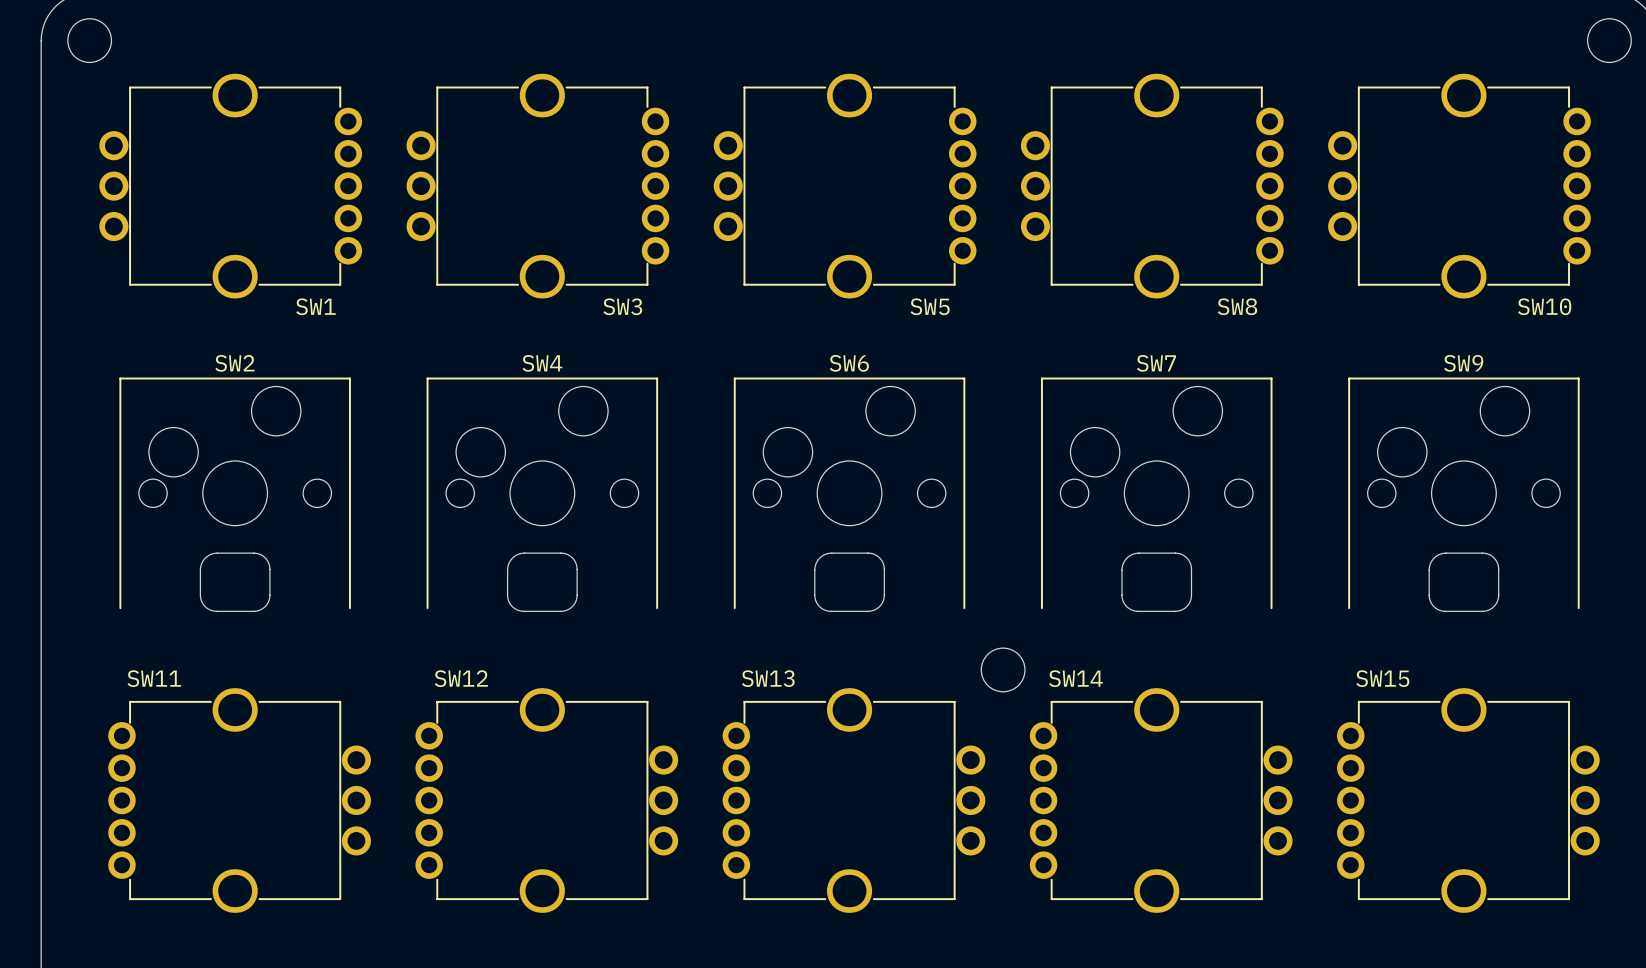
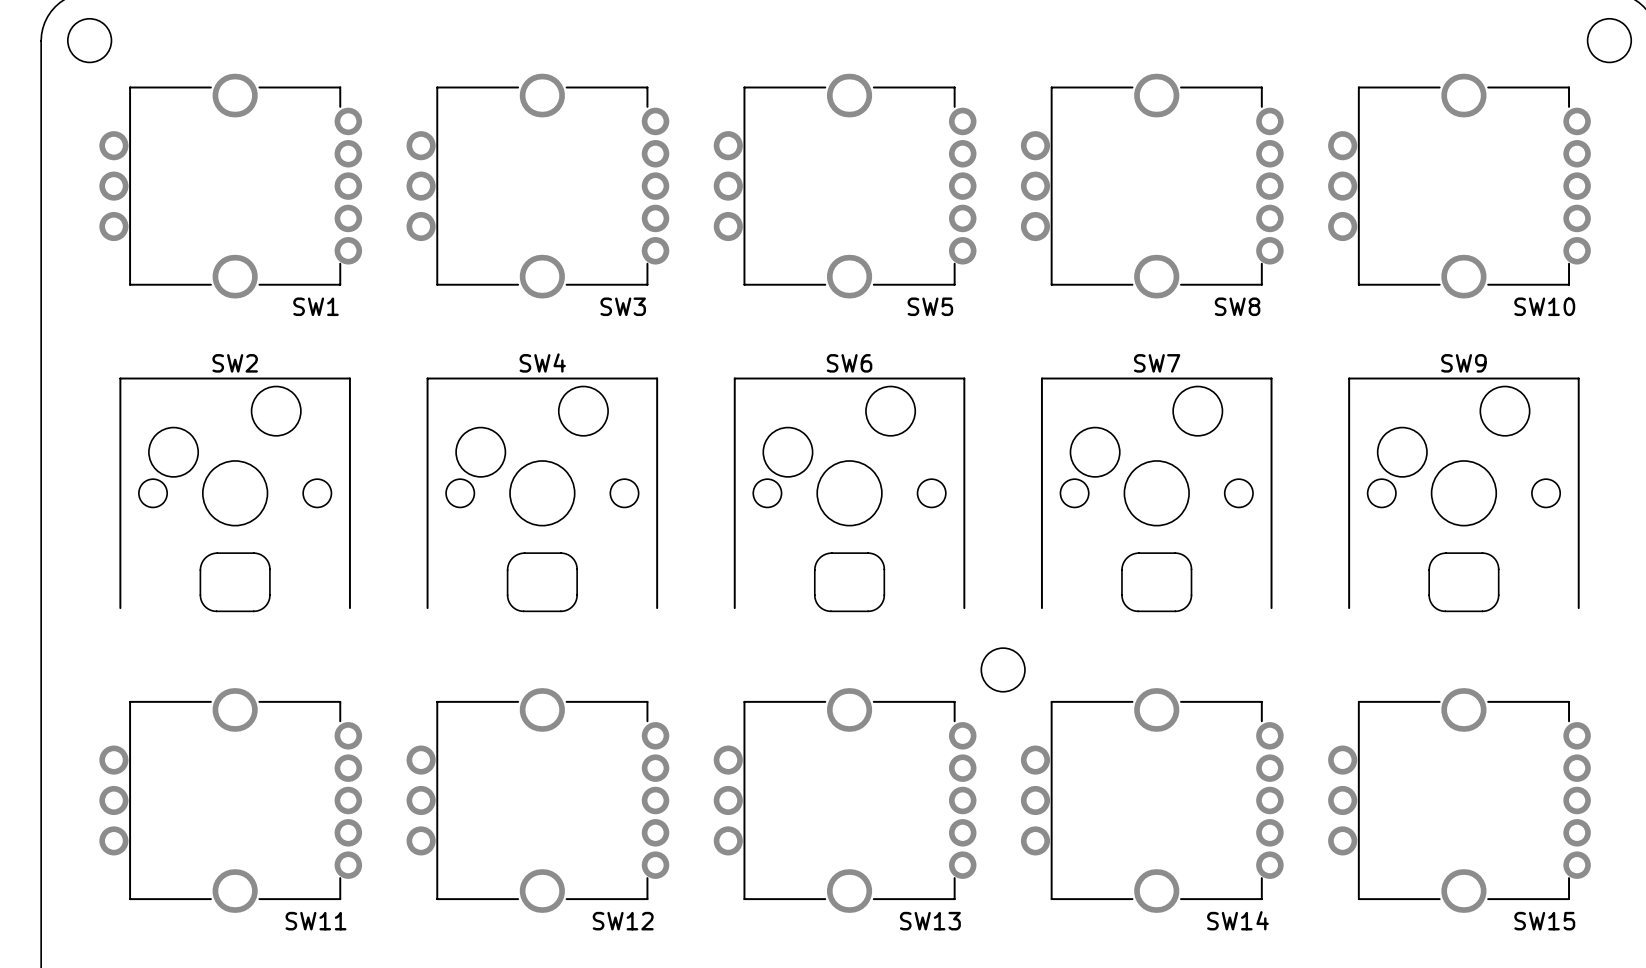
SW11 rotation: 0° (239, 800) -> 180° (230, 800)
SW12 rotation: 0° (546, 800) -> 180° (537, 800)
SW13 rotation: 0° (853, 800) -> 180° (845, 800)
SW14 rotation: 0° (1161, 800) -> 180° (1152, 800)
SW15 rotation: 0° (1468, 800) -> 180° (1459, 800)

